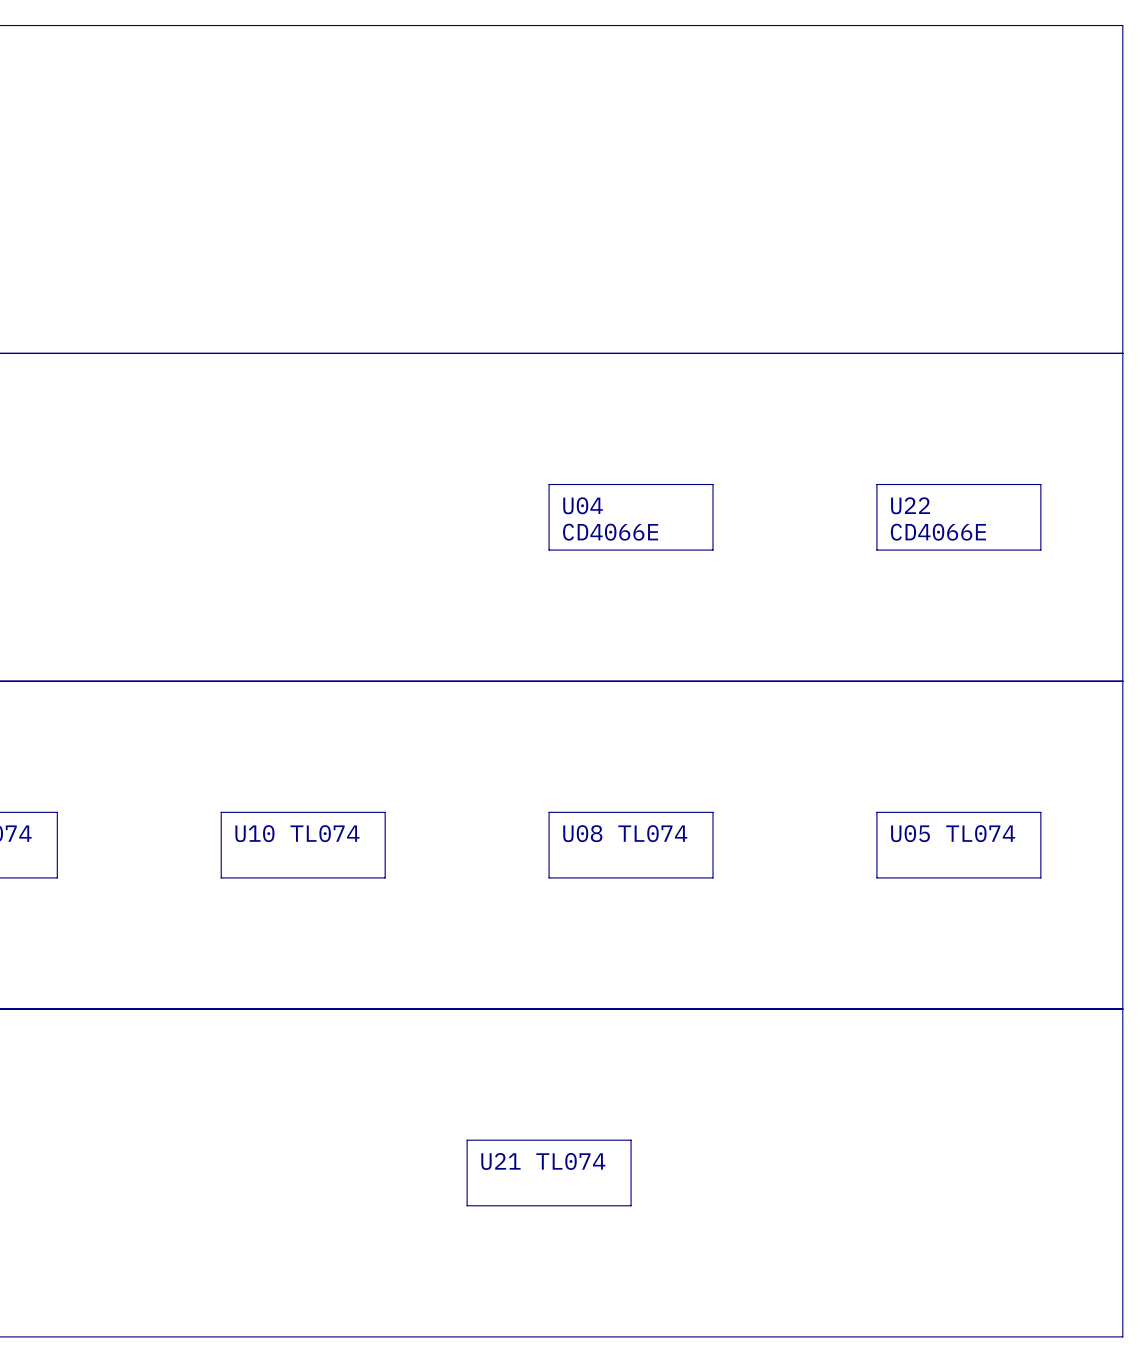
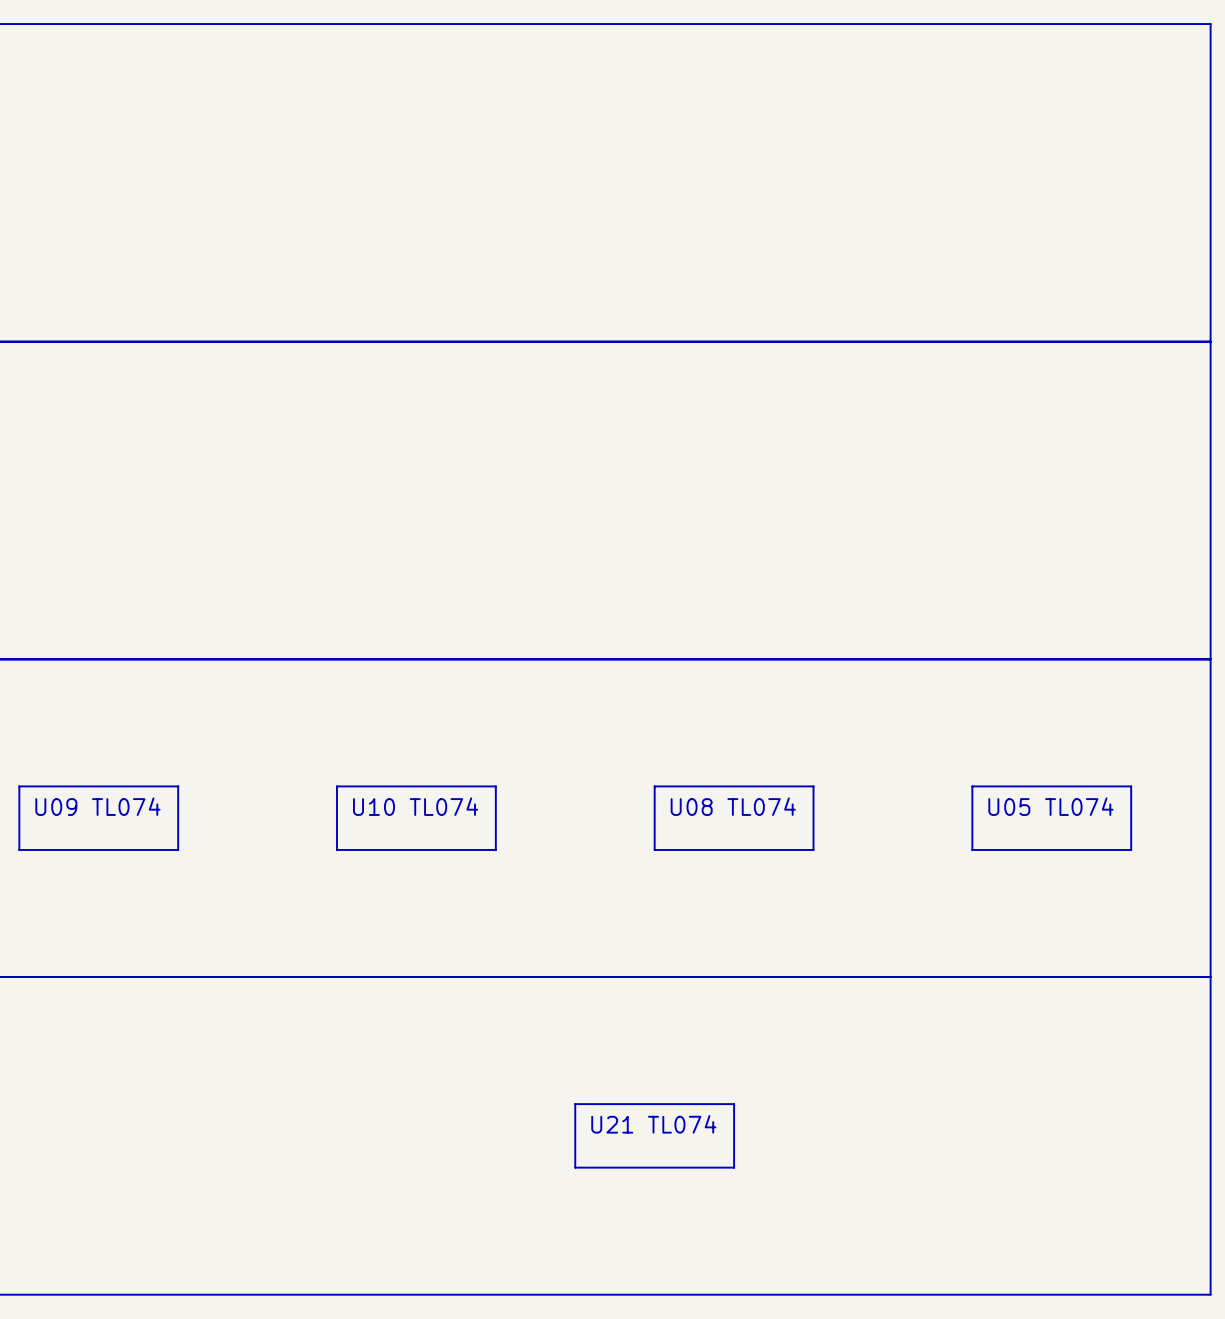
line: (549, 484) (713, 484) (713, 550) (549, 550) (549, 484) -> none
line: (876, 484) (1040, 484) (1040, 550) (876, 550) (876, 484) -> none
text: U04 (583, 505) -> none
text: U22 (910, 505) -> none
text: CD4066E (610, 532) -> none
text: CD4066E (938, 532) -> none

